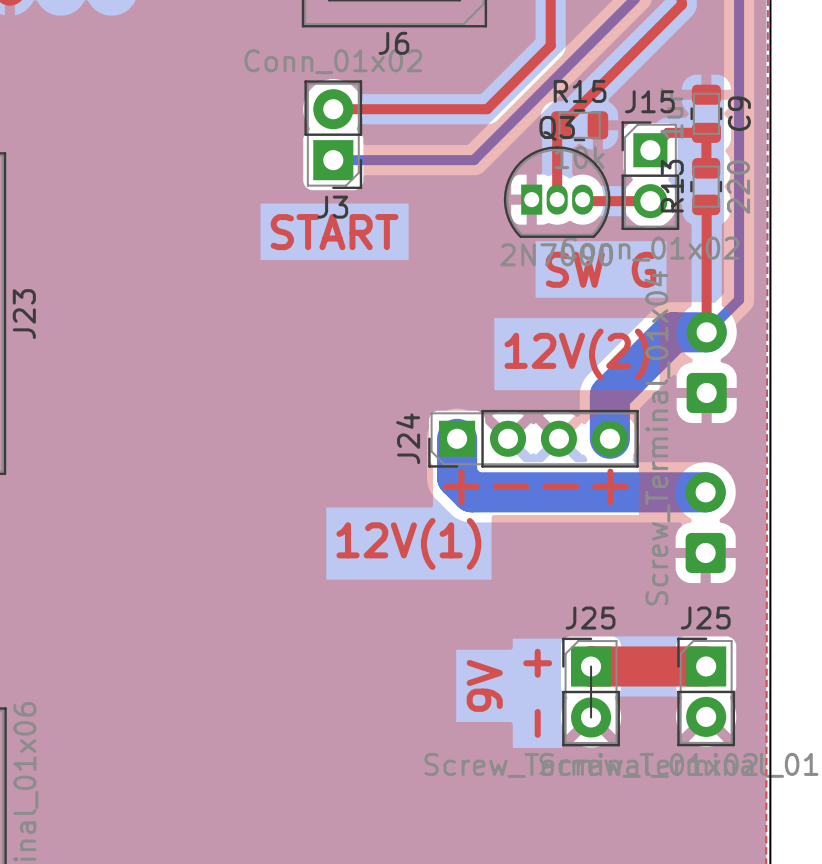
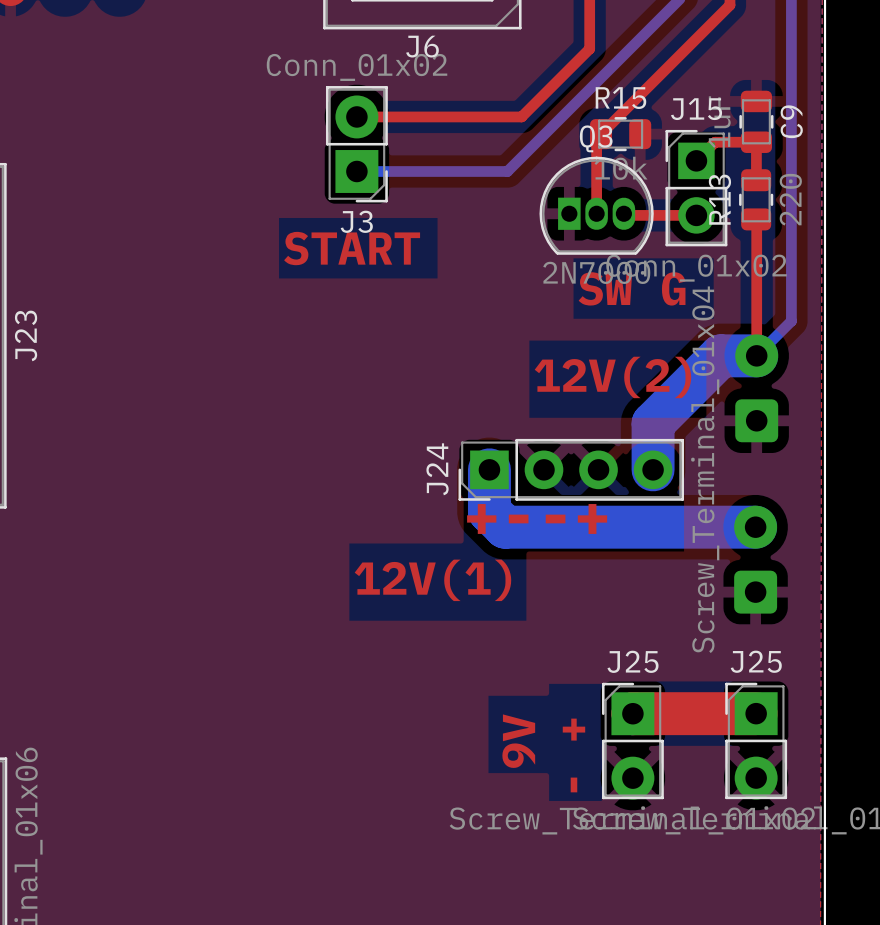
J25 footprint: [562, 637, 620, 747] -> [601, 682, 664, 800]
J25 footprint: [677, 637, 736, 747] -> [725, 682, 788, 800]

